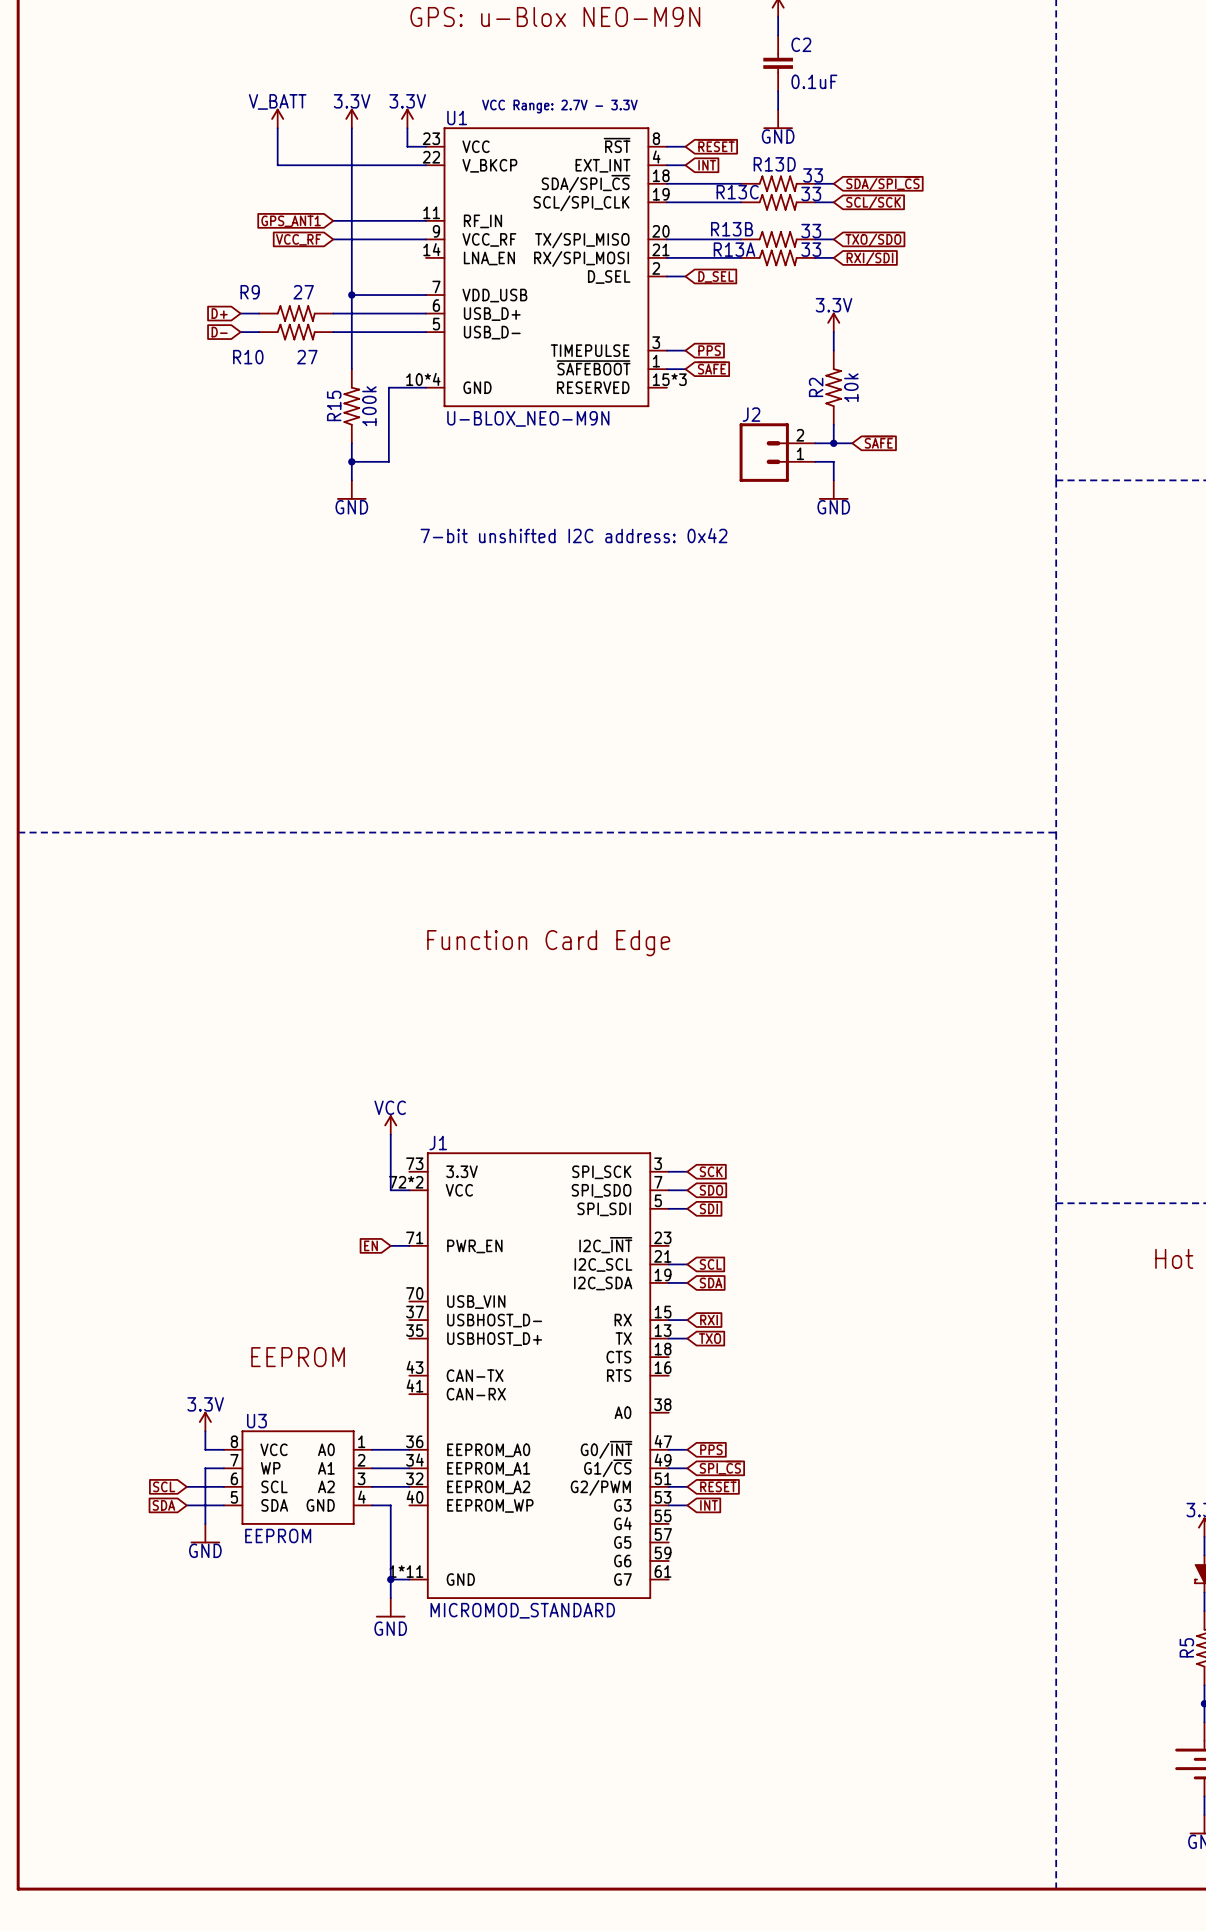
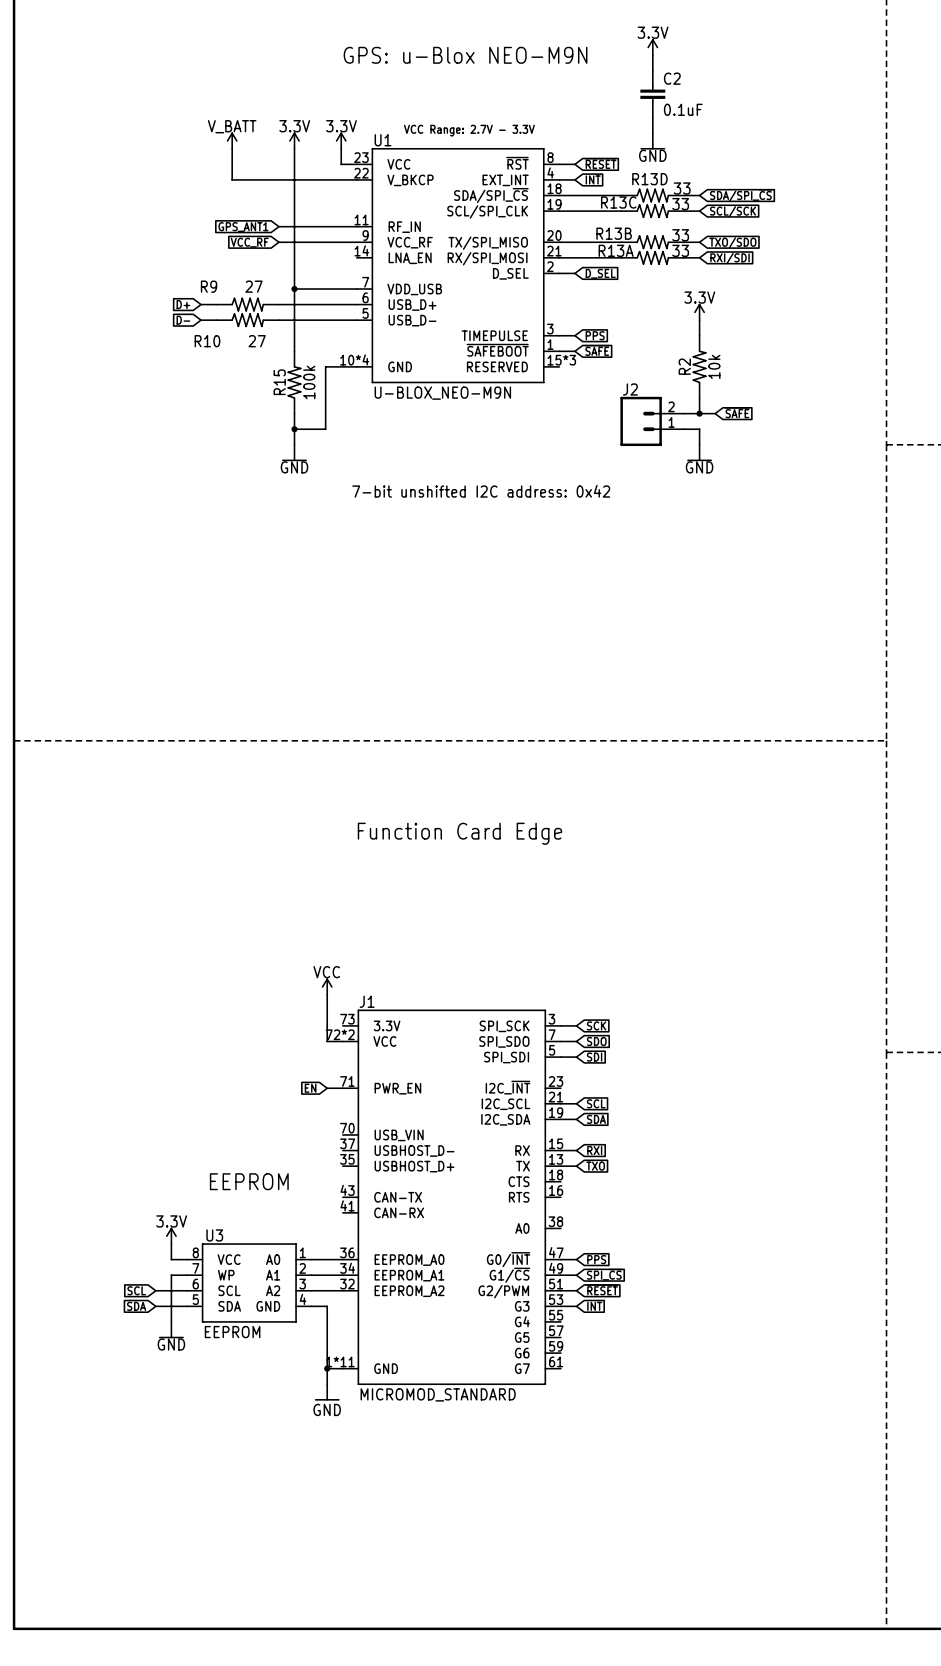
J1 symbol: [409, 1152, 669, 1600] -> [342, 1009, 561, 1386]

